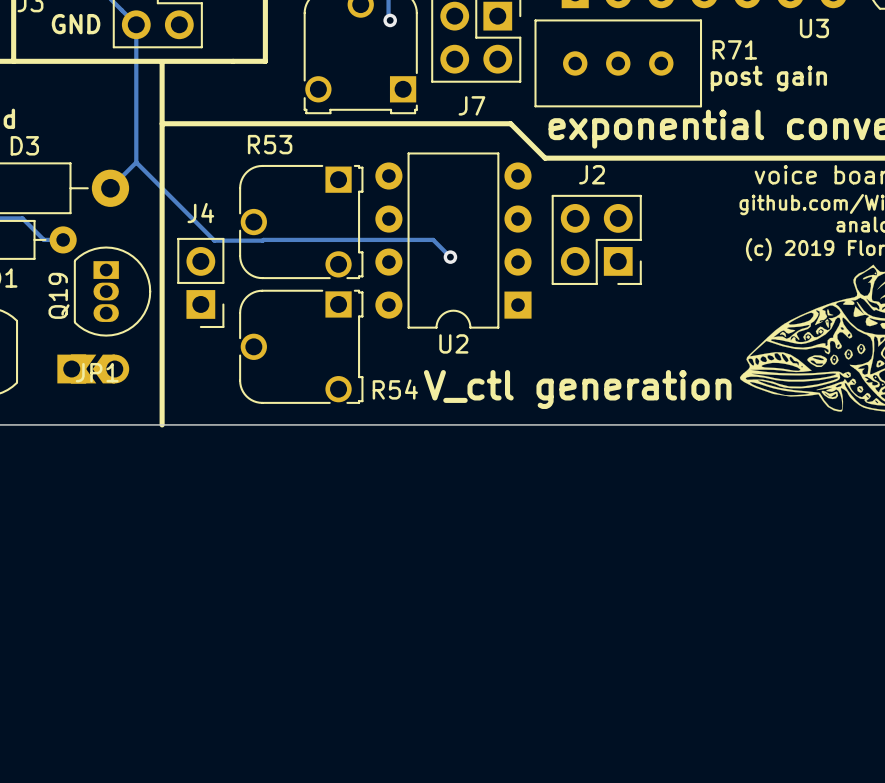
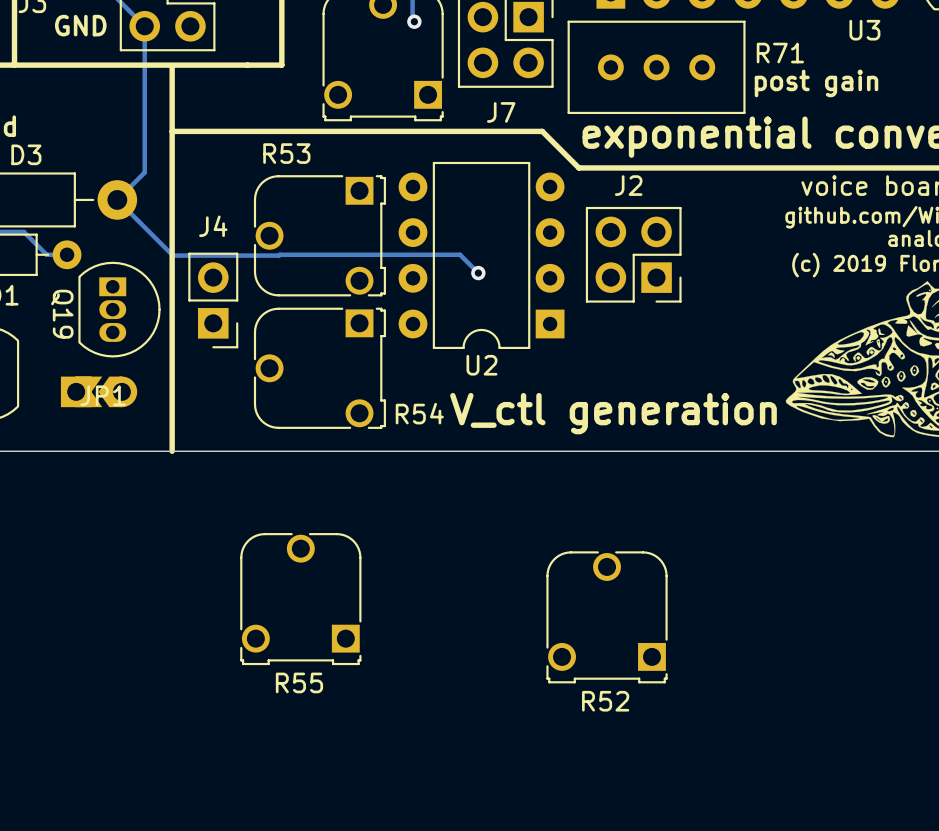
track: (136, 162) (214, 240) -> (117, 199) (172, 255) (227, 255)
Q19 name rotation: 0° (59, 295) -> 180° (62, 314)
R55: none -> (300, 599)
R52: none -> (607, 617)

